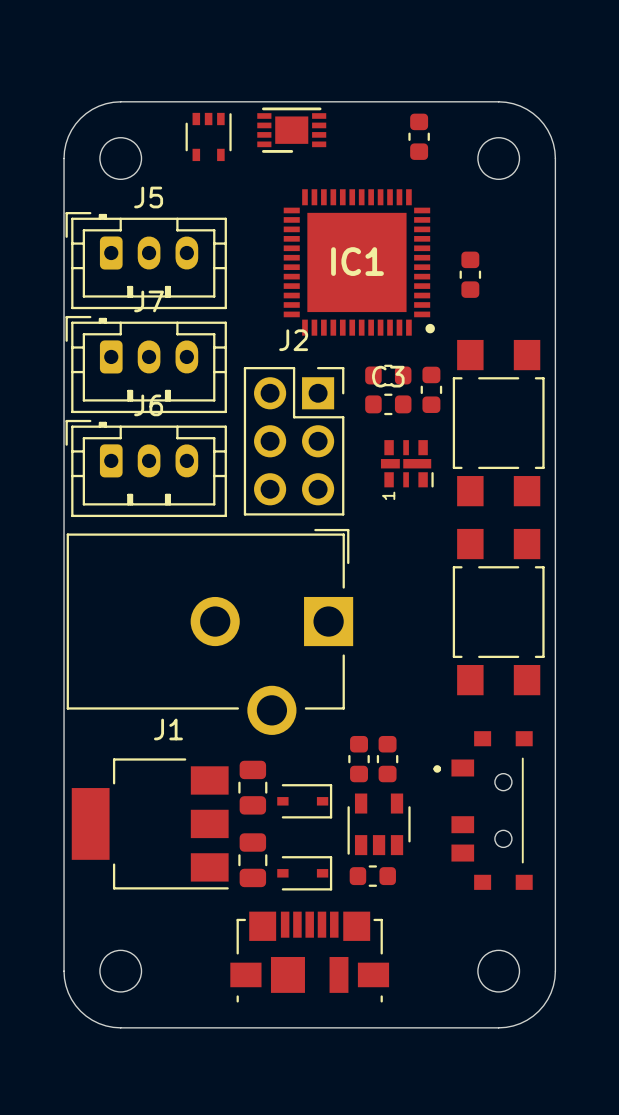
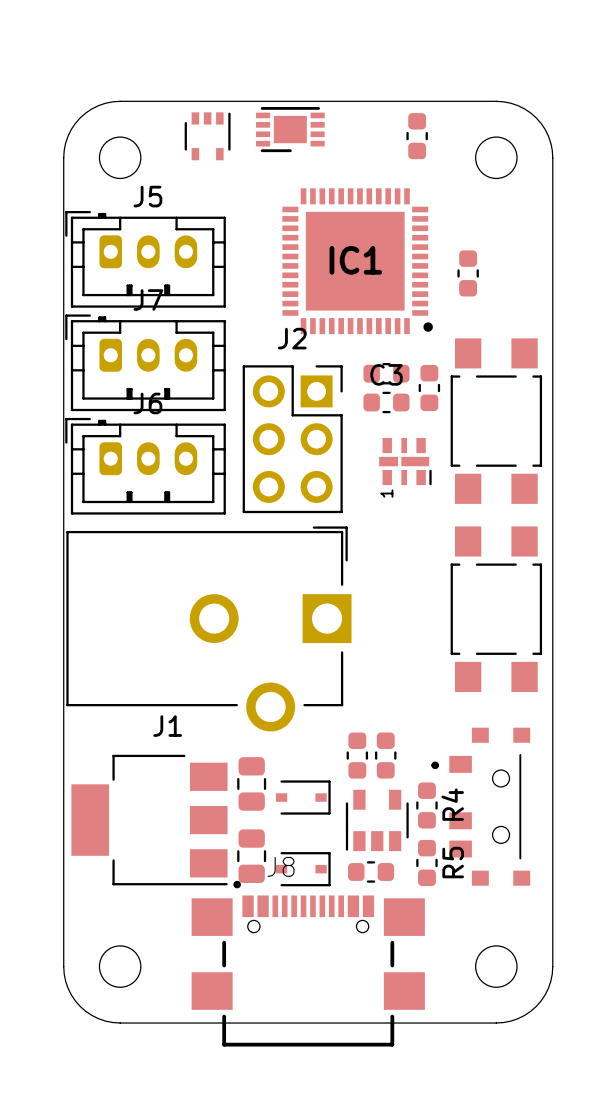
R4: none -> (426, 805)
R5: none -> (426, 862)
part: (309, 957) -> none
J8: none -> (308, 963)

